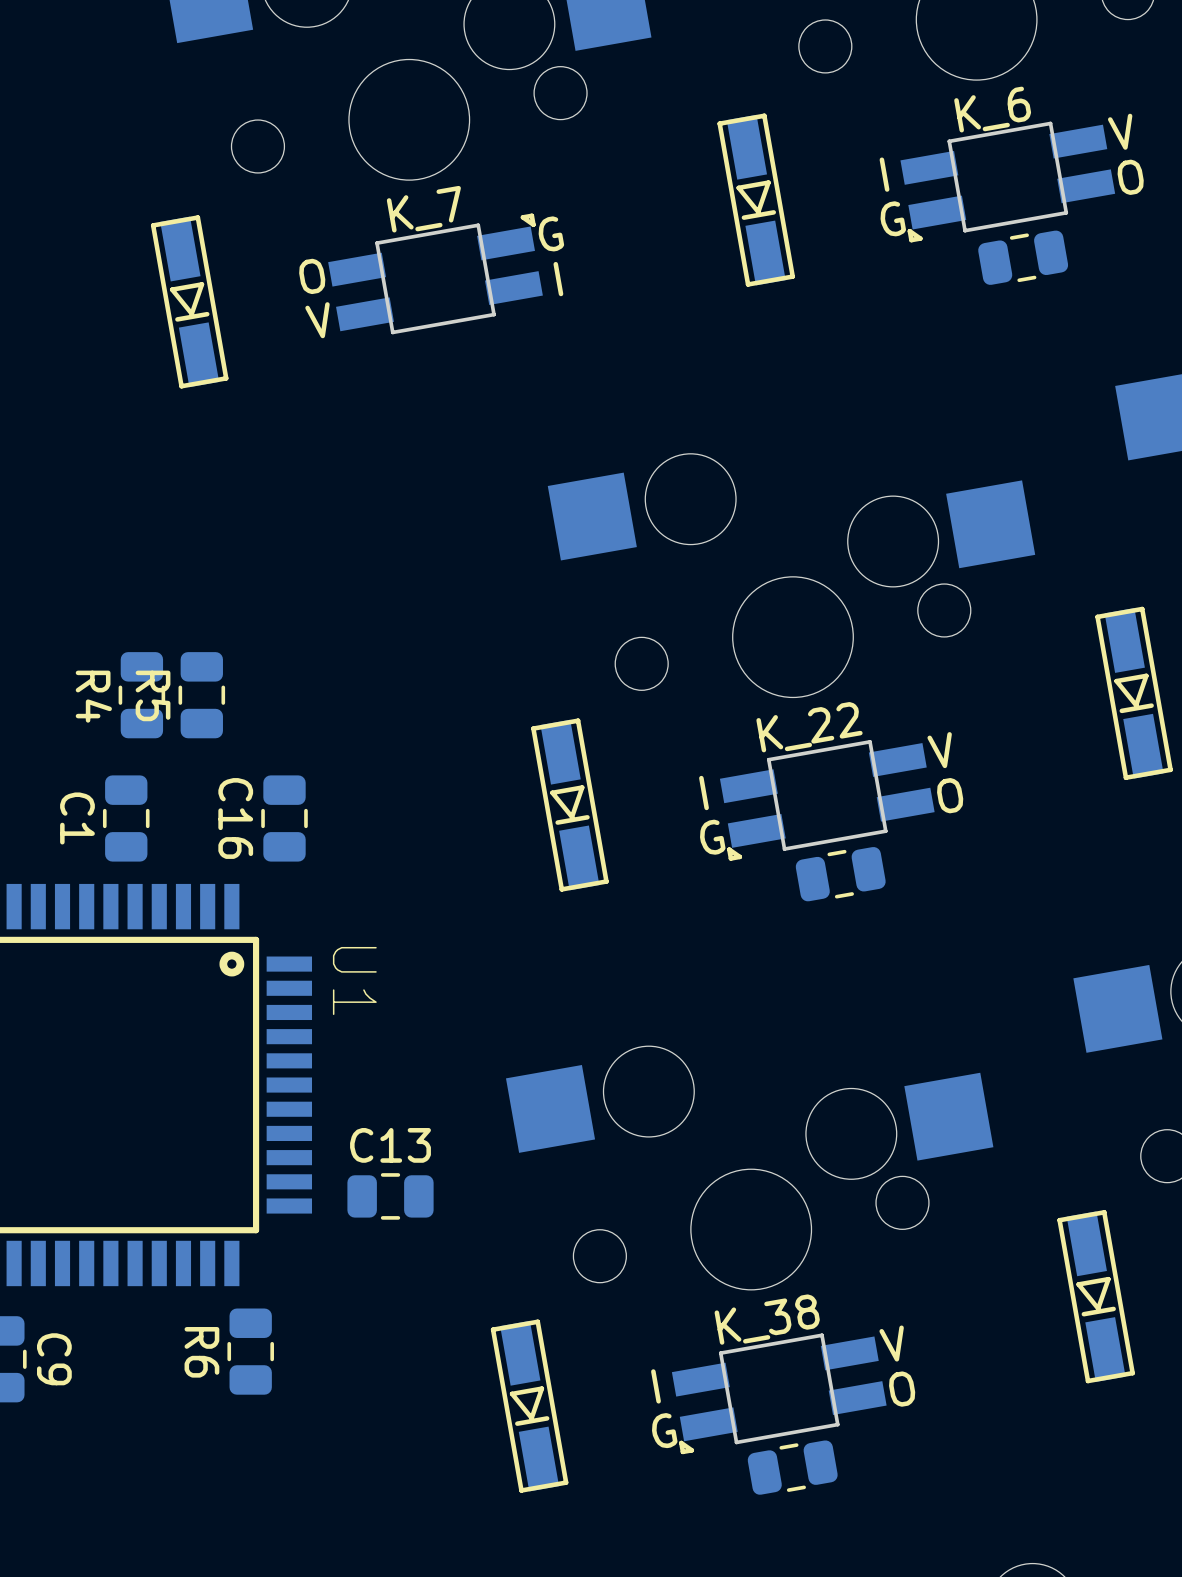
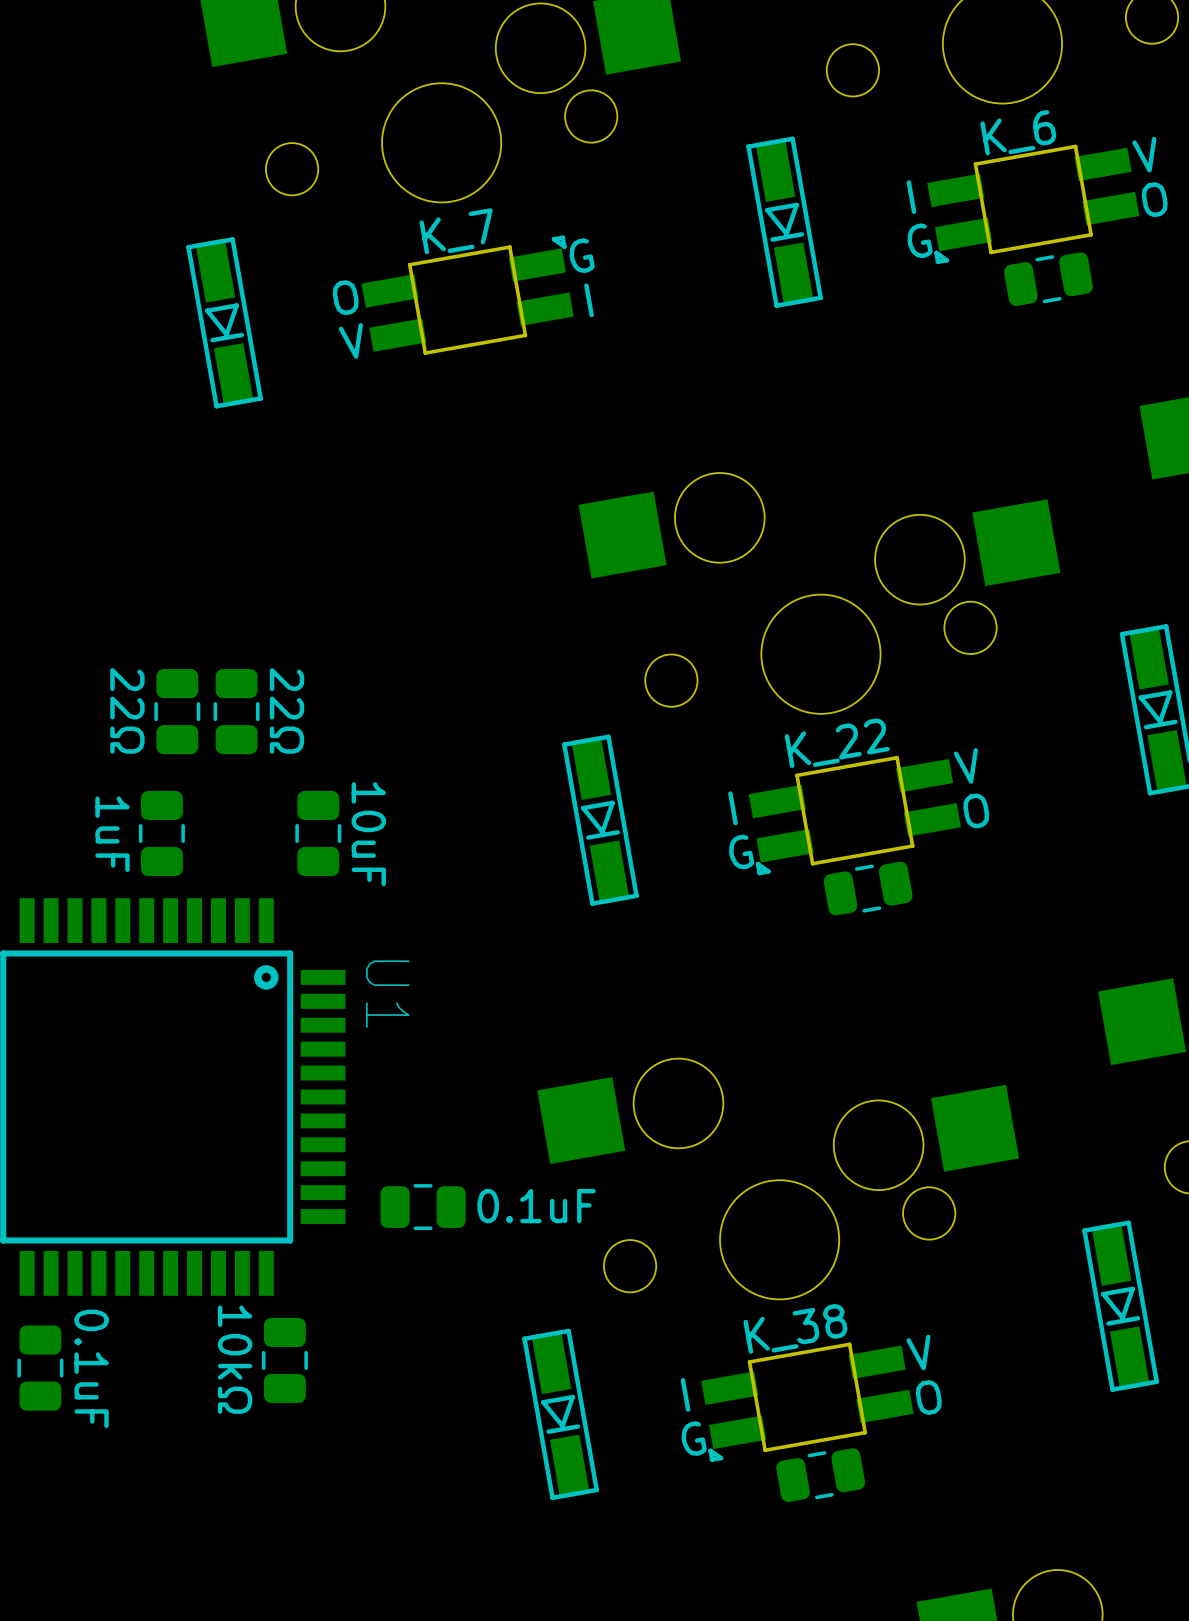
R4 value: none -> 22Ω (127, 710)
R5 value: none -> 22Ω (287, 710)
R5 name: R5 (153, 695) -> none
R4 name: R4 (93, 696) -> none
C1 name: C1 (77, 818) -> none
C16 name: C16 (235, 818) -> none
C1 value: none -> 1uF (112, 834)
C16 value: none -> 10uF (368, 834)
C13 name: C13 (390, 1145) -> none
C13 value: none -> 0.1uF (536, 1206)
R6 value: none -> 10kΩ (235, 1359)
R6 name: R6 (201, 1352) -> none
C9 name: C9 (54, 1359) -> none
C9 value: none -> 0.1uF (91, 1368)

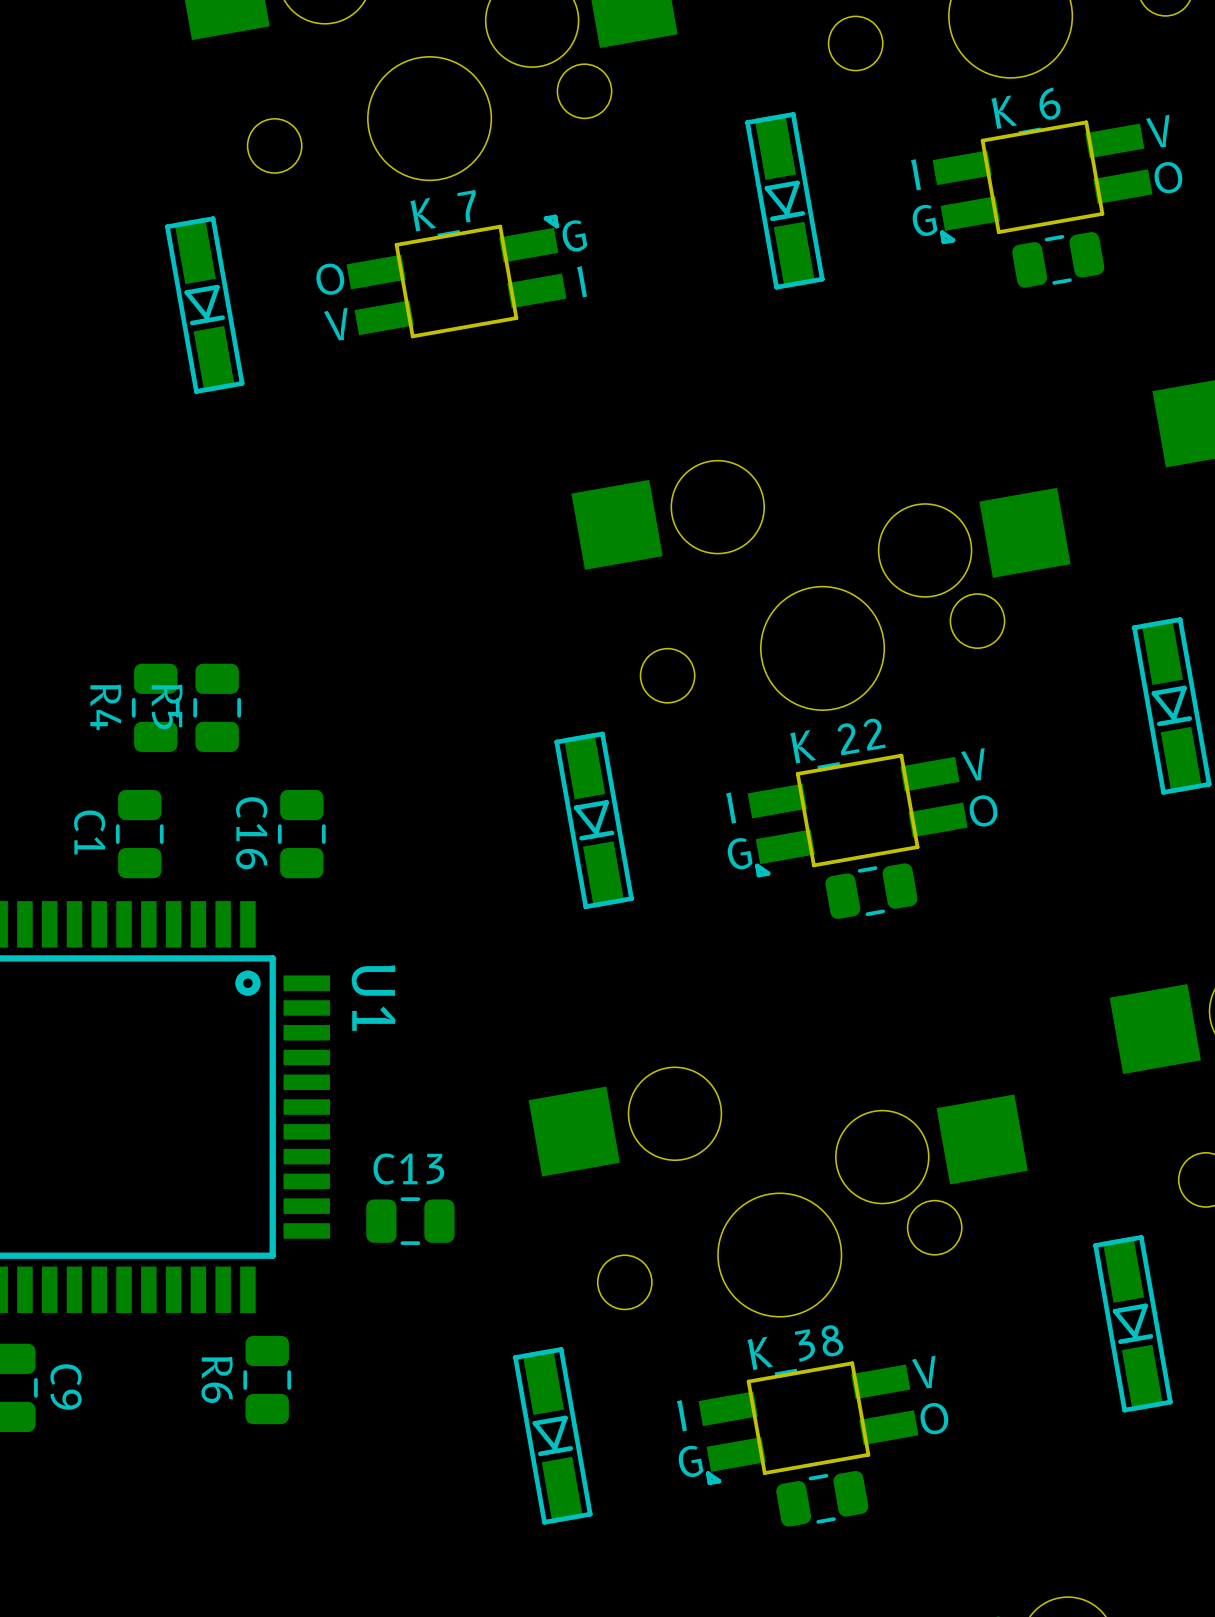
R4 value: 22Ω (127, 710) -> none
R5 value: 22Ω (287, 710) -> none
R5 name: none -> R5 (167, 706)
R4 name: none -> R4 (105, 707)
C1 name: none -> C1 (89, 832)
C16 name: none -> C16 (251, 833)
C1 value: 1uF (112, 834) -> none
C16 value: 10uF (368, 834) -> none
C13 name: none -> C13 (408, 1169)
C13 value: 0.1uF (536, 1206) -> none
R6 value: 10kΩ (235, 1359) -> none
R6 name: none -> R6 (217, 1379)
C9 name: none -> C9 (65, 1386)
C9 value: 0.1uF (91, 1368) -> none

